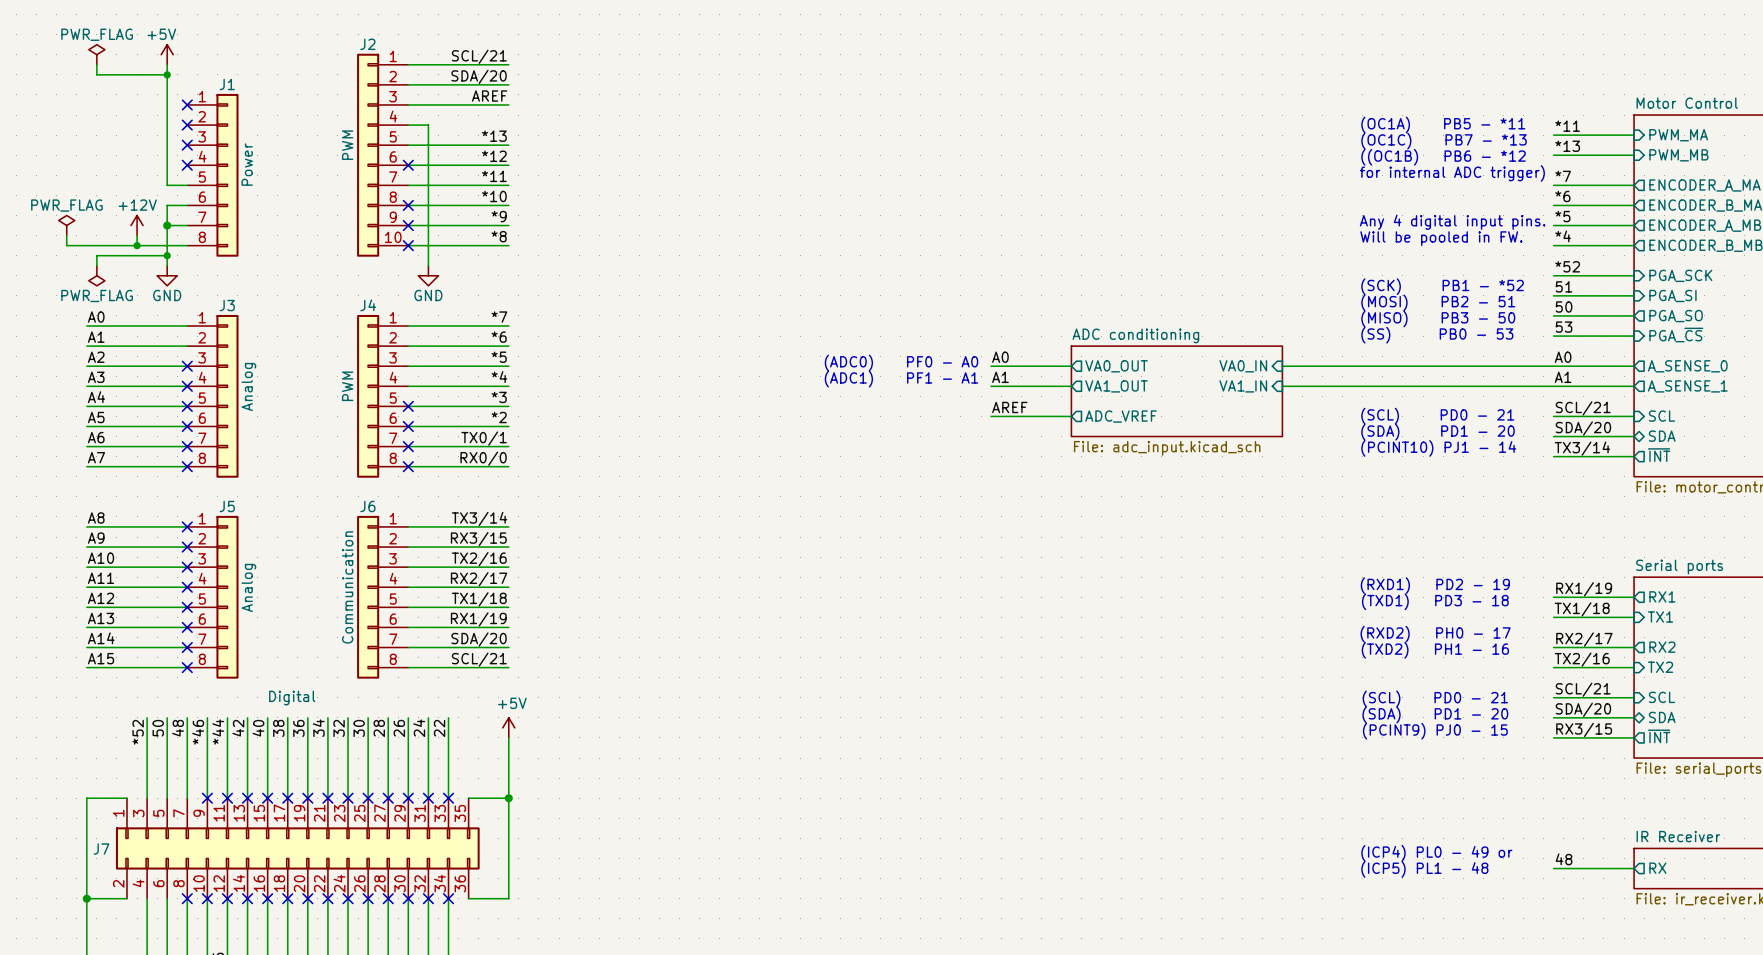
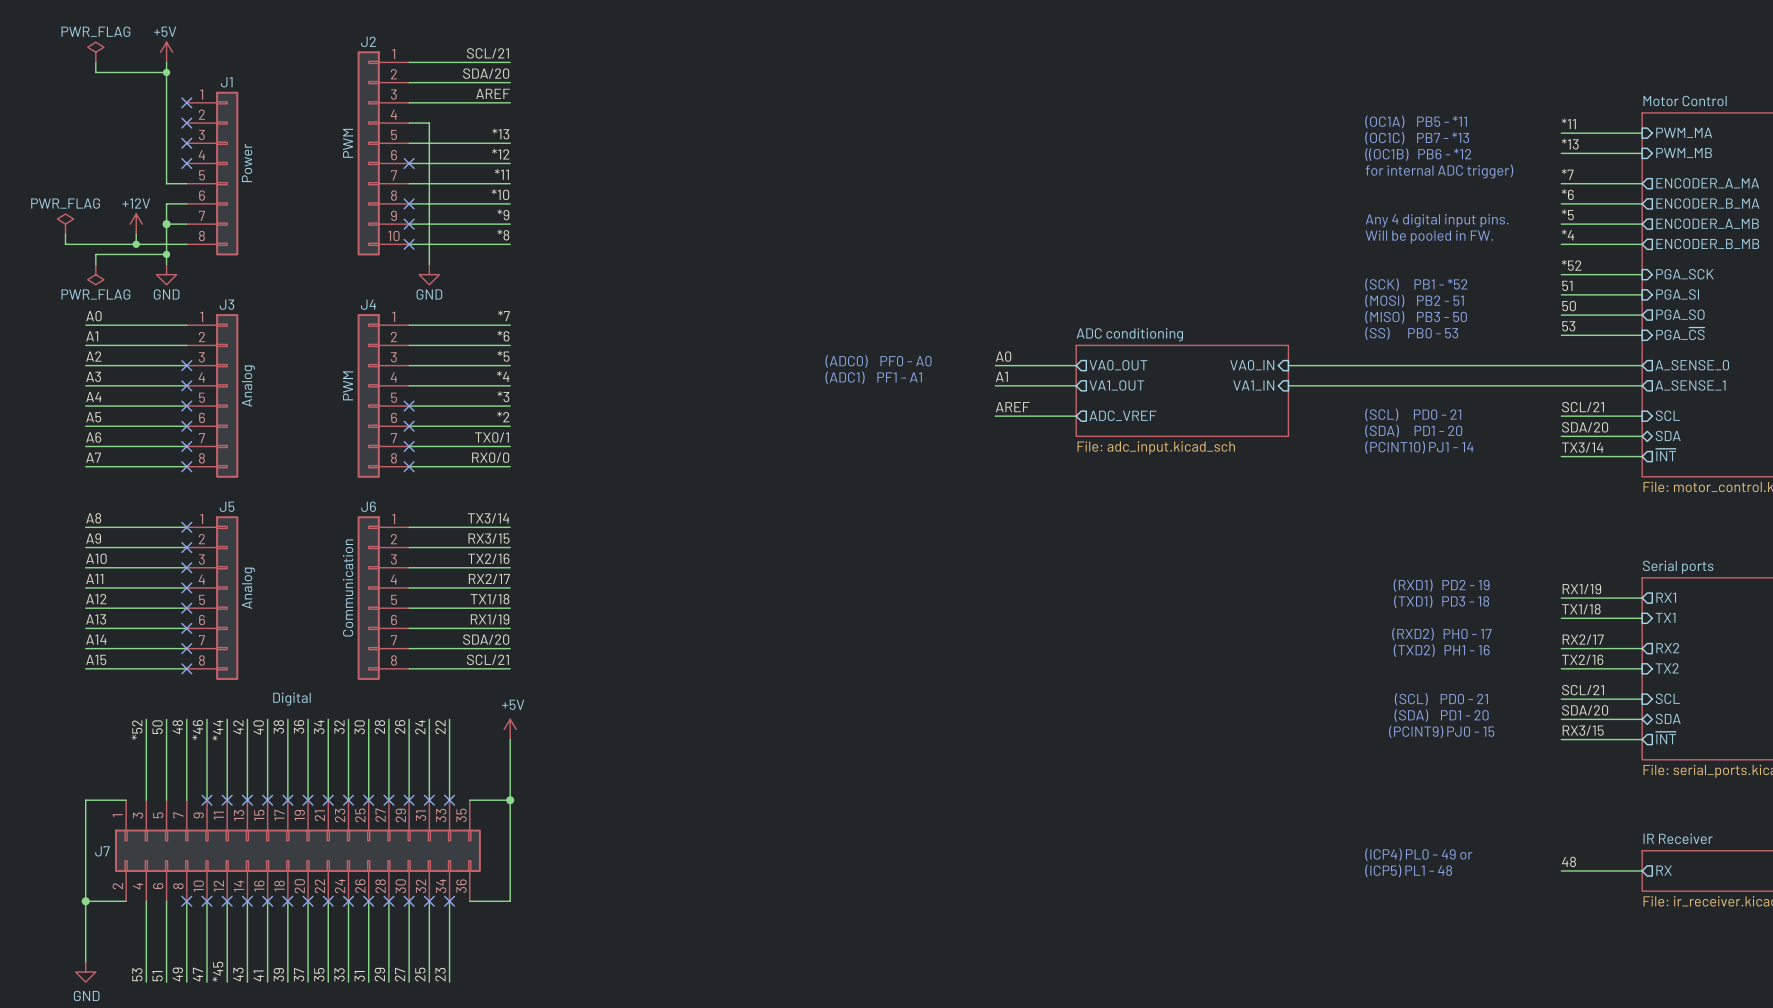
label: A0 (1563, 357) -> none
label: A1 (1563, 377) -> none

